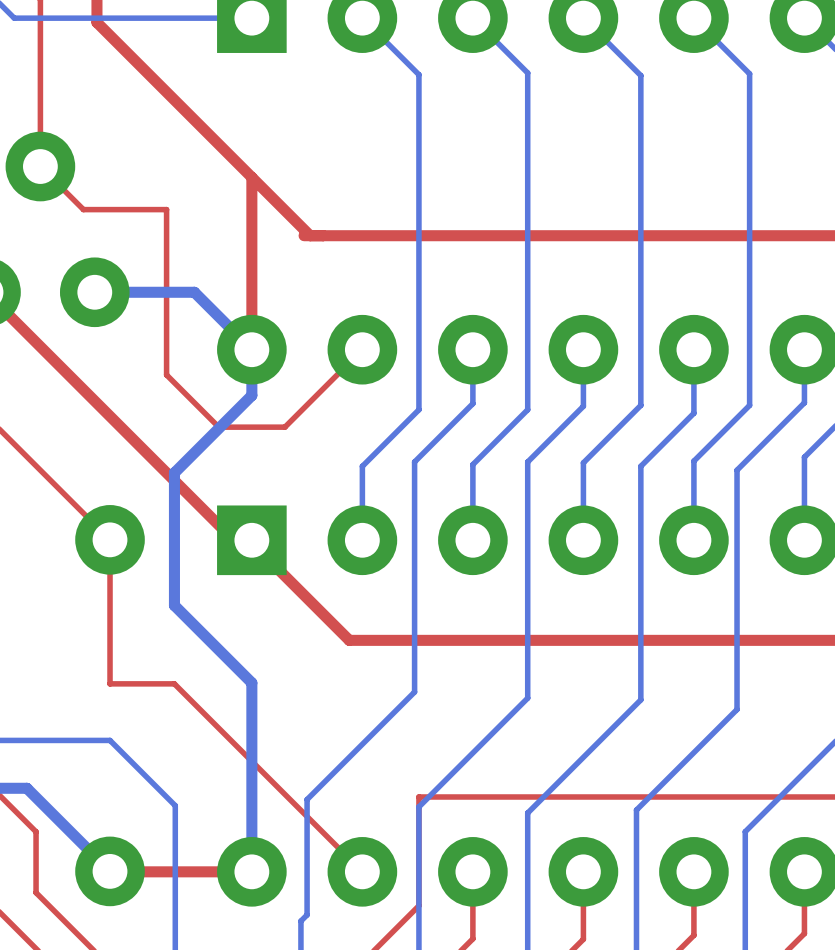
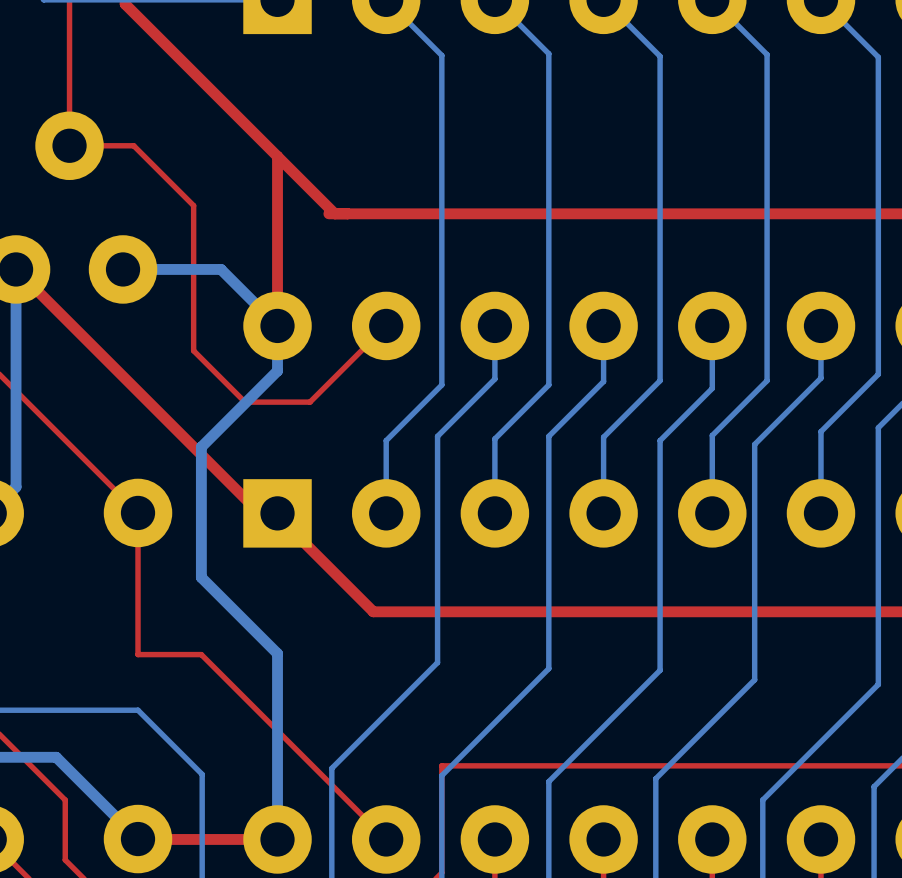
top track: (40, 166) (83, 209) (166, 209) (166, 227) -> (69, 145) (133, 145) (193, 205)

